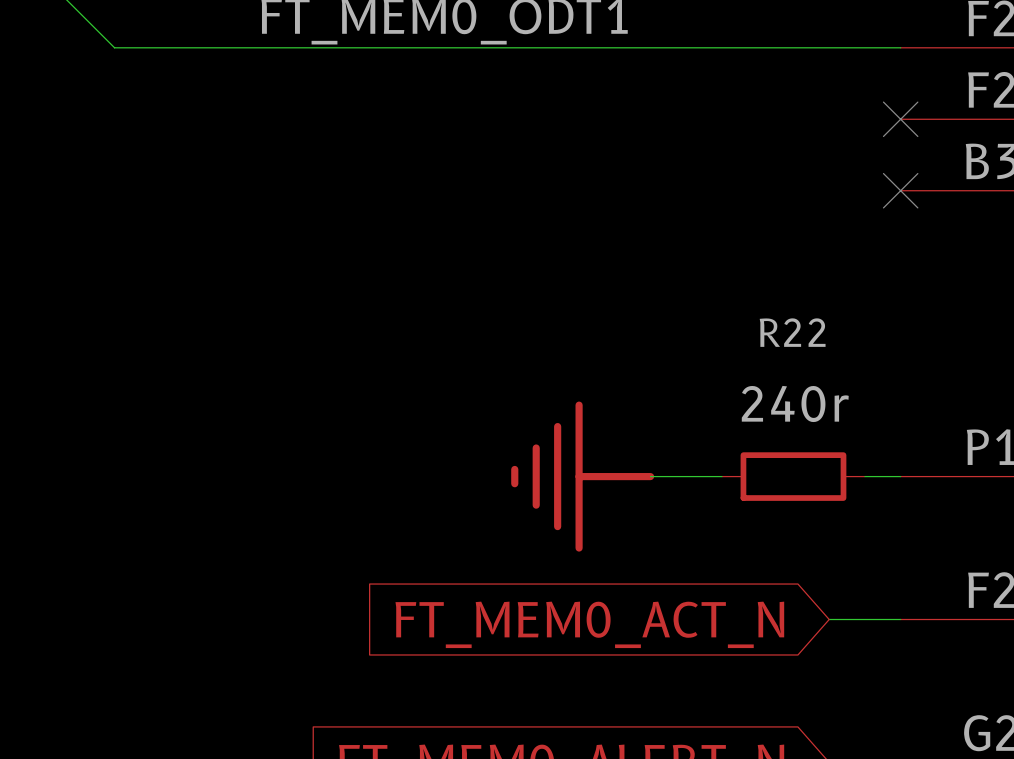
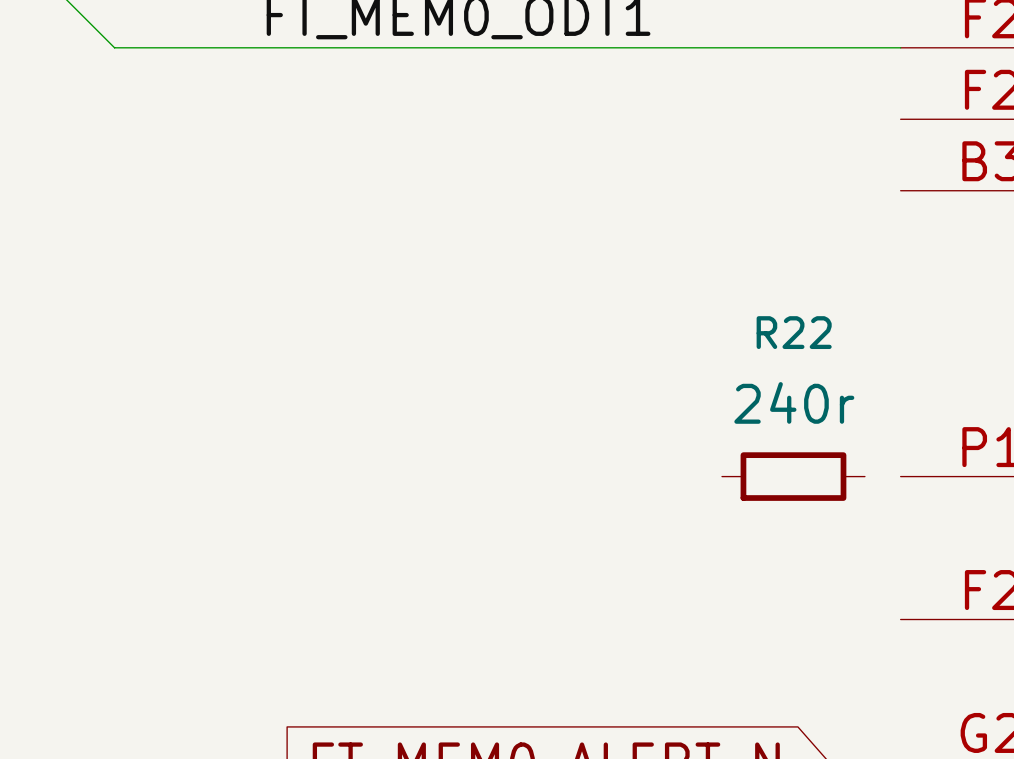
no-connect mark: (900, 119) -> none
no-connect mark: (900, 190) -> none
power symbol: (582, 476) -> none
wire: (650, 476) (722, 476) -> none
wire: (864, 476) (900, 476) -> none
wire: (829, 619) (900, 619) -> none
global label: FT_MEM0_ACT_N (589, 624) -> none

